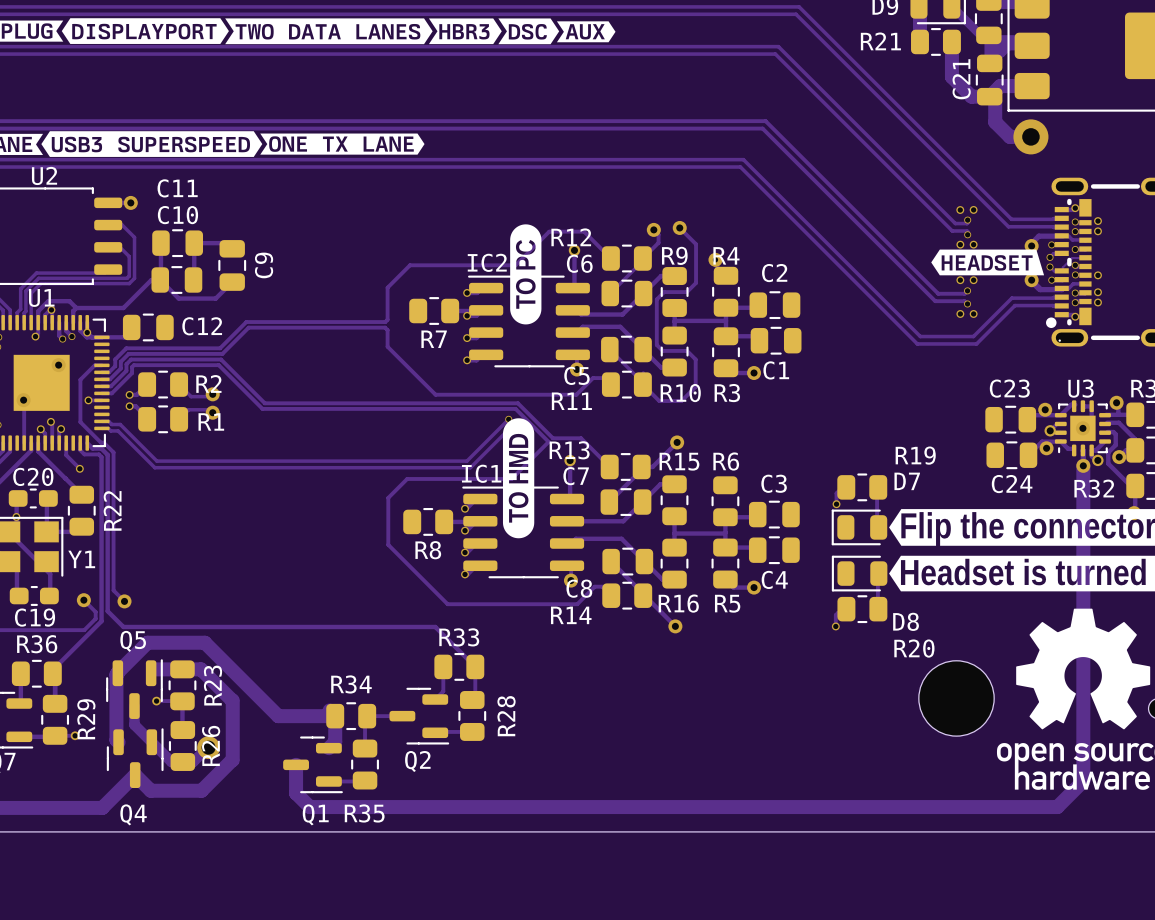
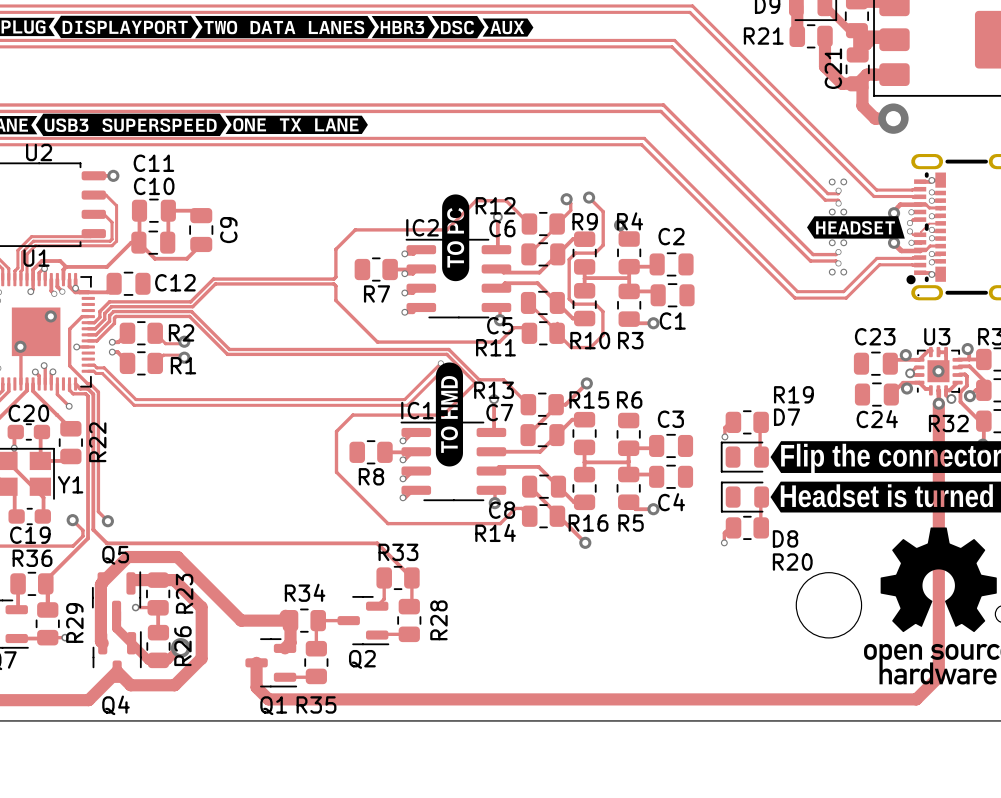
via: (1097, 221) -> none
via: (1097, 231) -> none
via: (1097, 275) -> none
via: (1097, 292) -> none
via: (1097, 302) -> none

